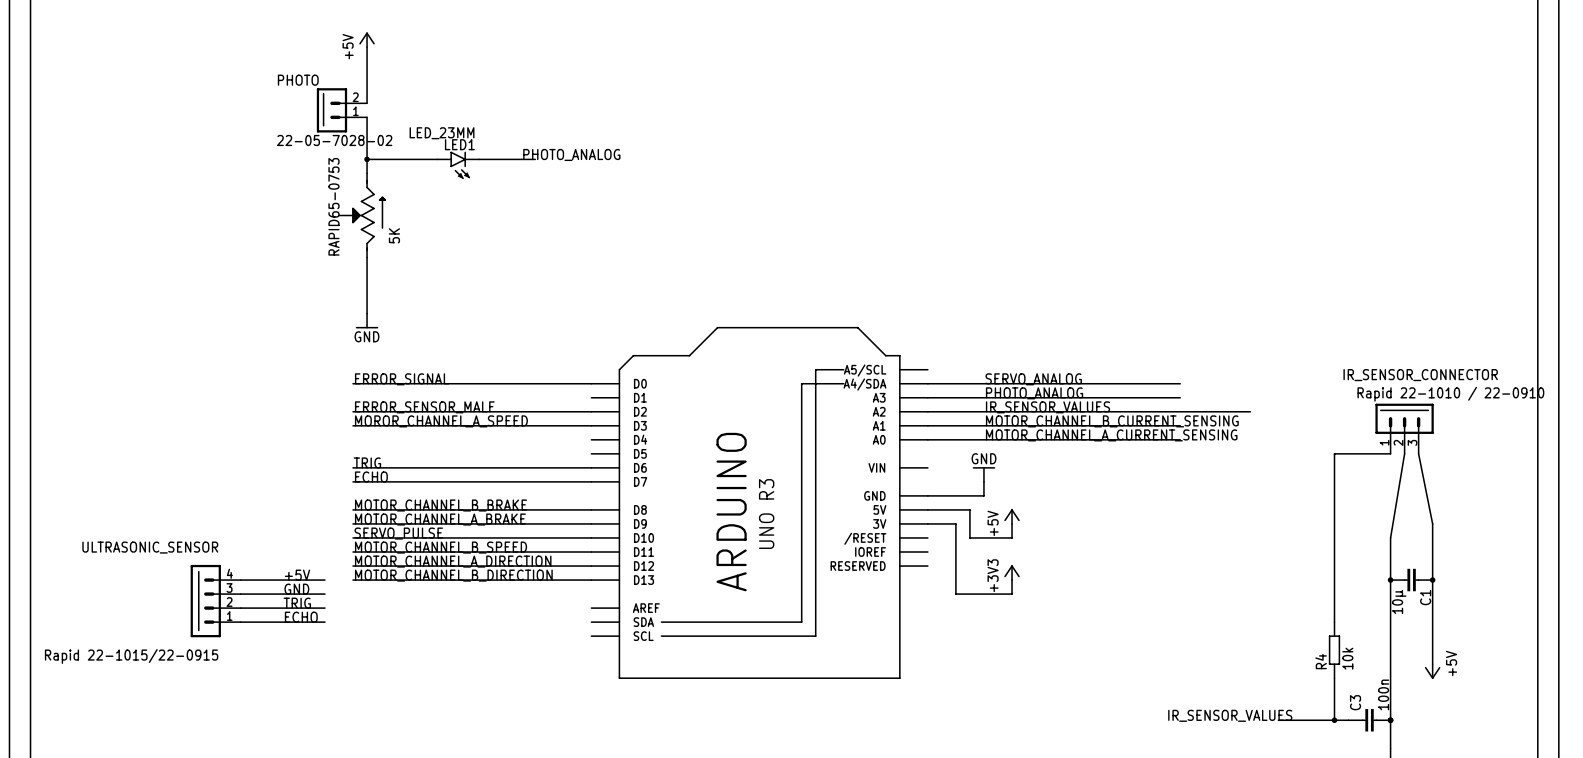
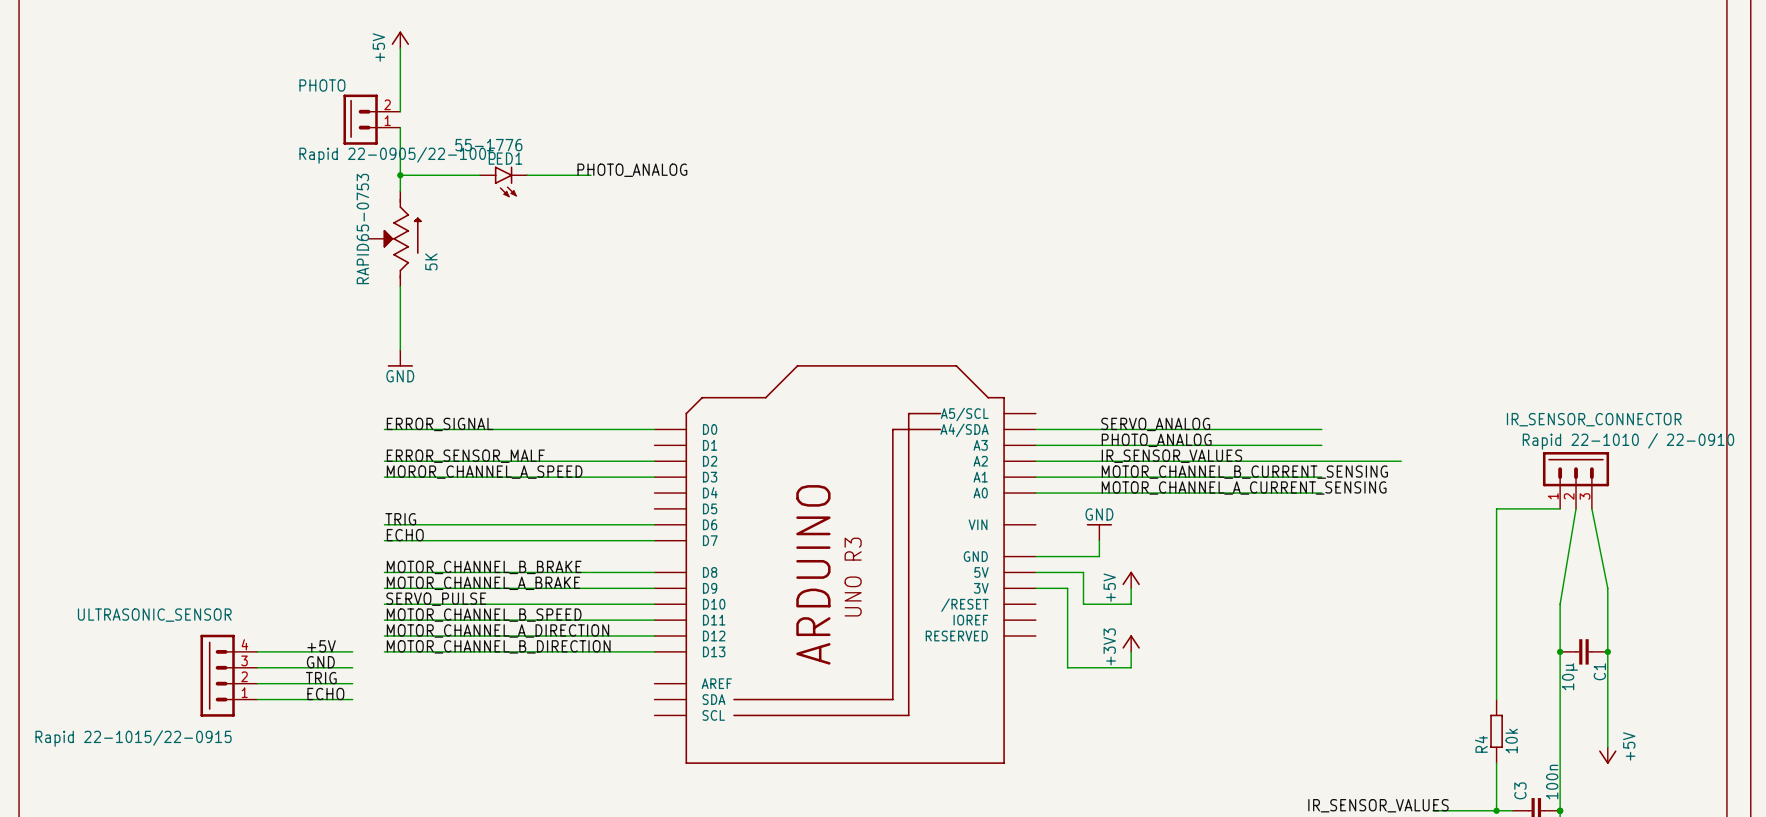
LED1 value: LED_23MM (442, 133) -> 55-1776 (488, 145)
PHOTO value: 22-05-7028-02 (334, 140) -> Rapid 22-0905/22-1005 (397, 155)

